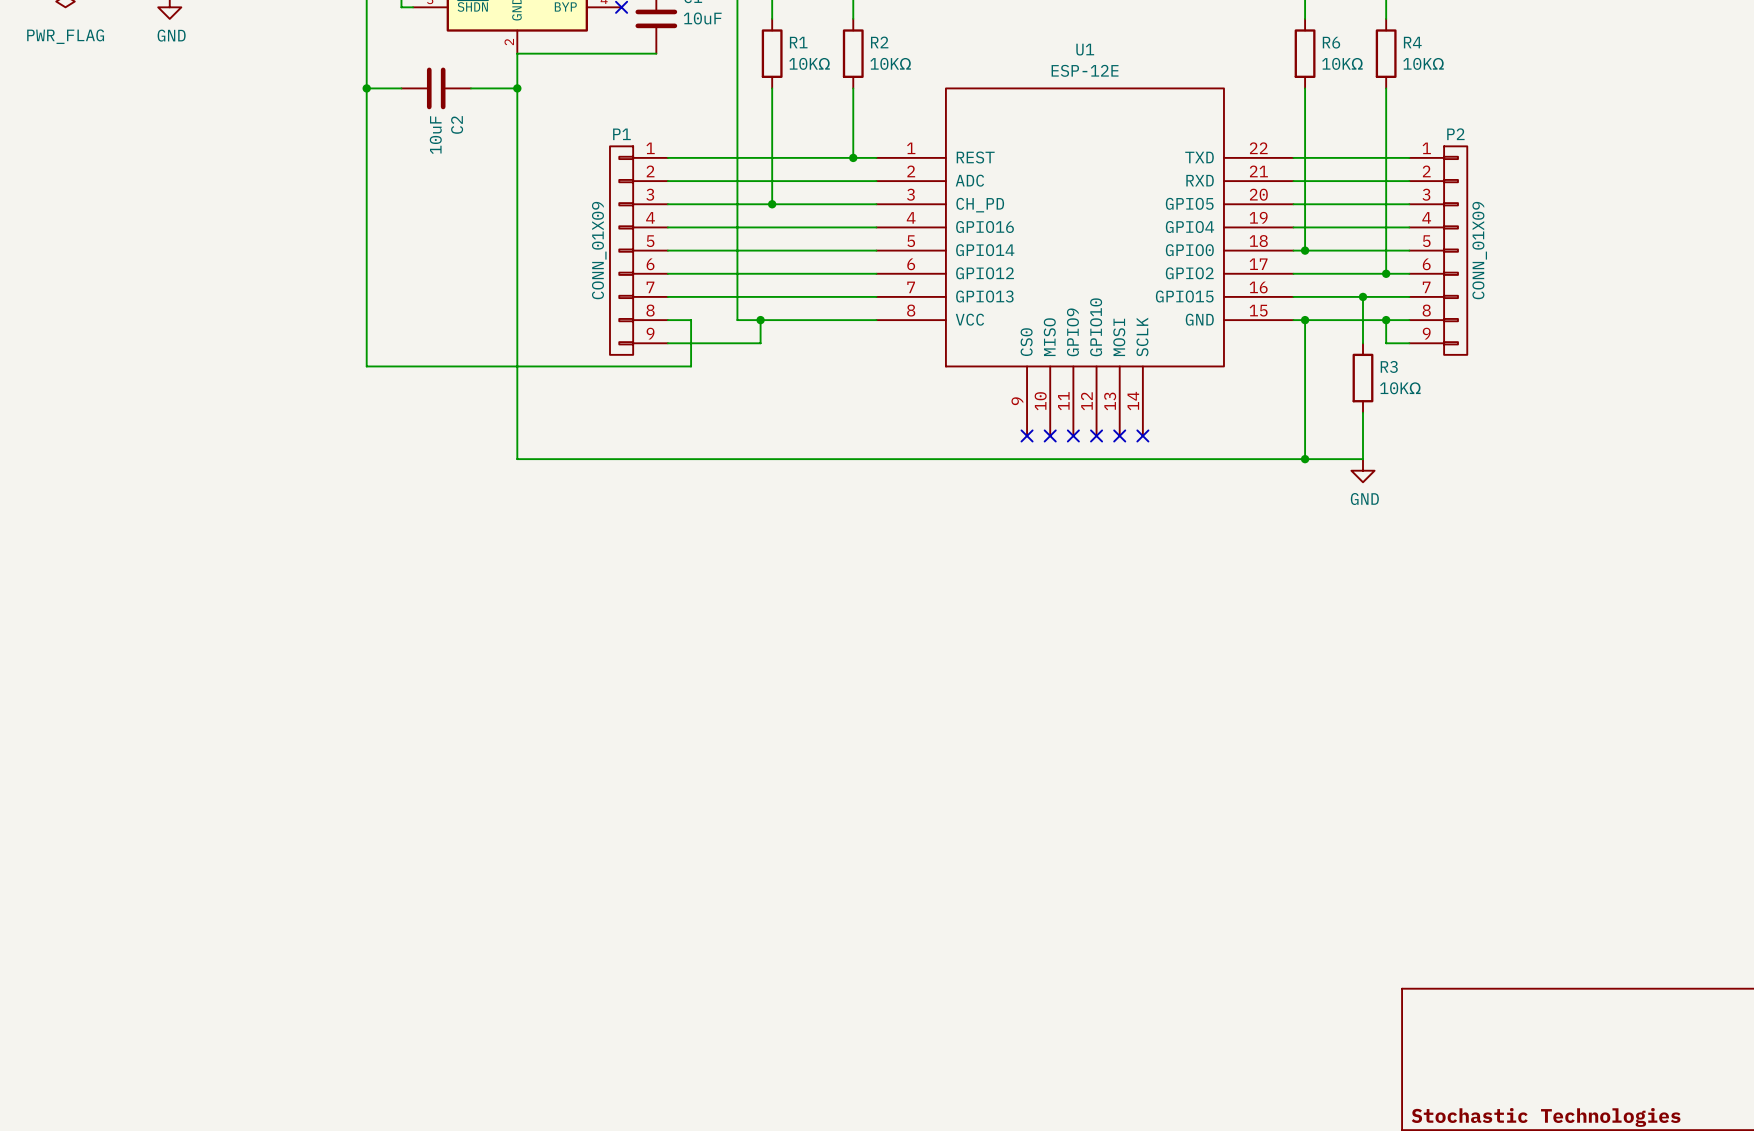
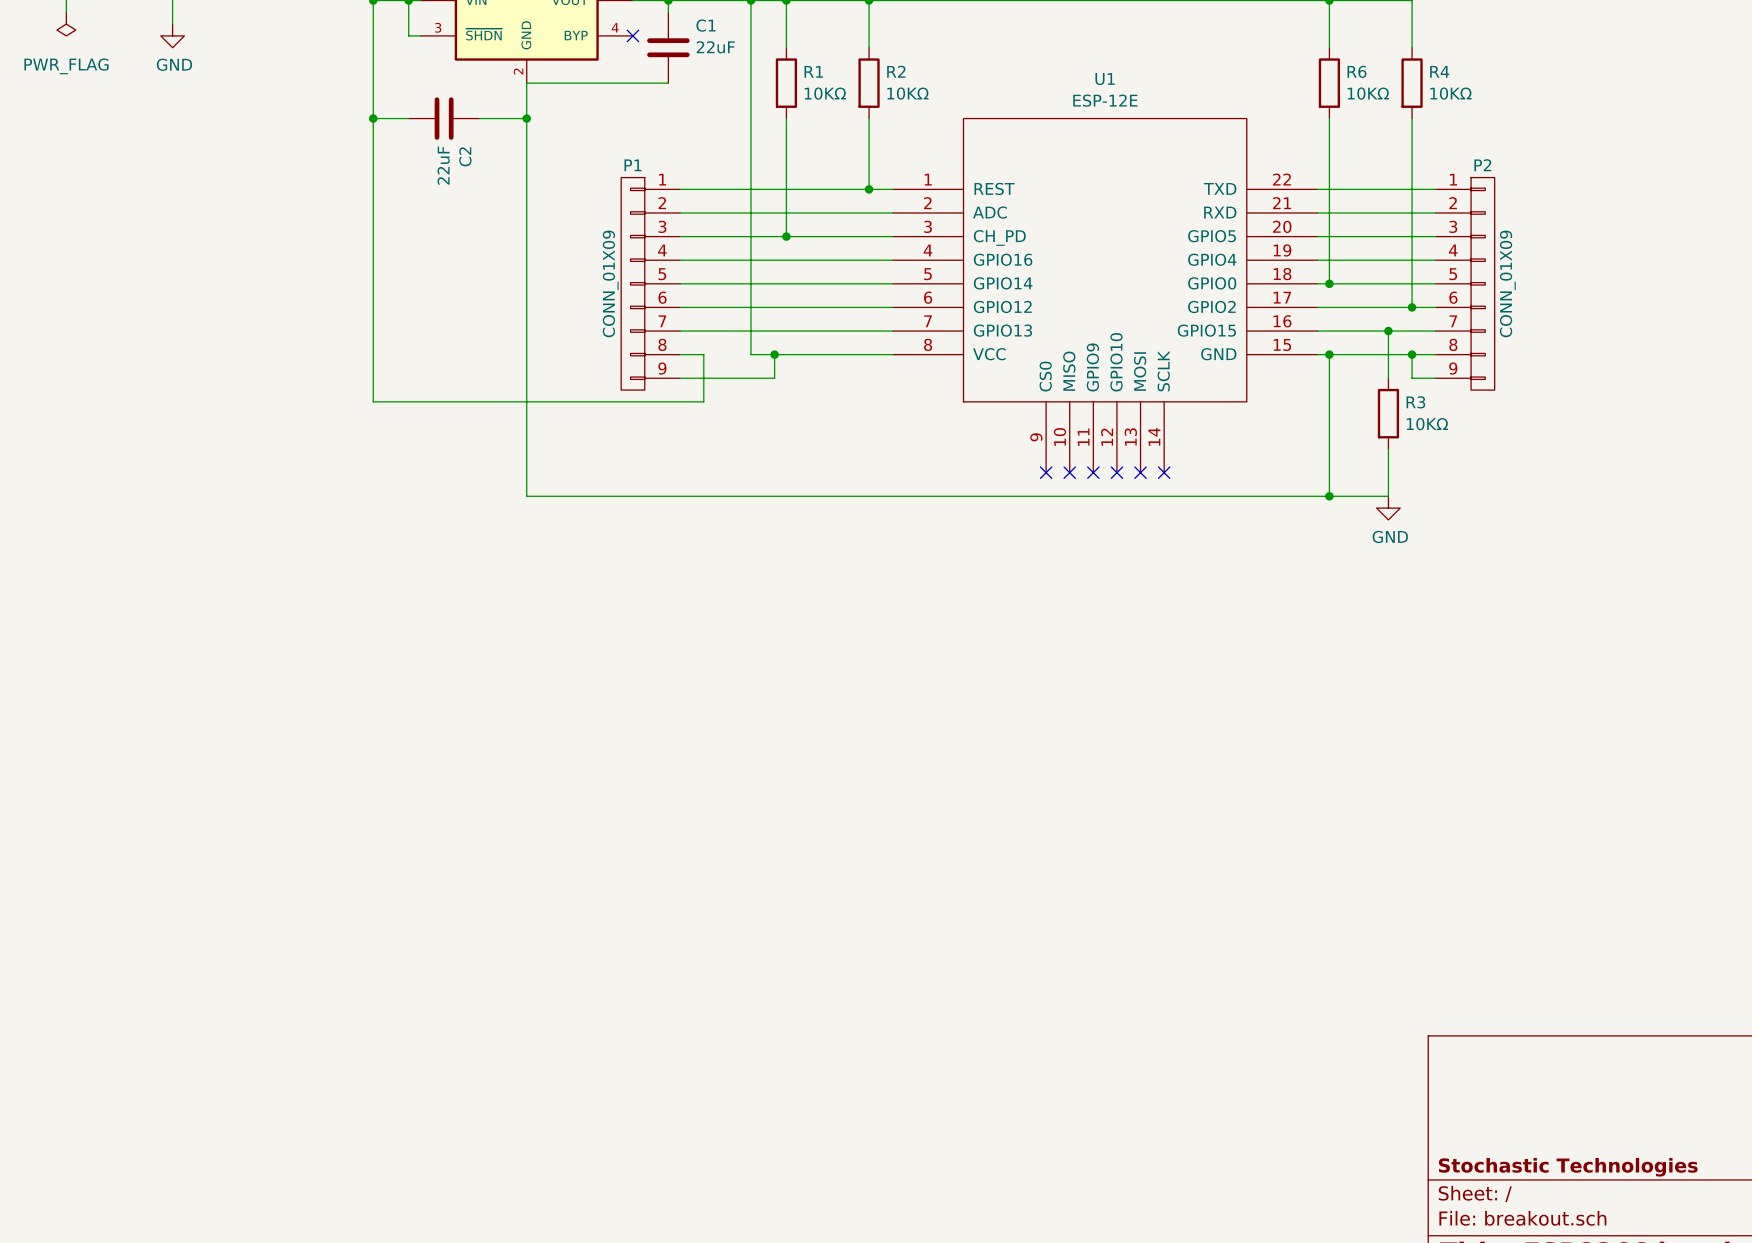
C1 value: 10uF (702, 18) -> 22uF (715, 47)
C2 value: 10uF (435, 135) -> 22uF (443, 165)

